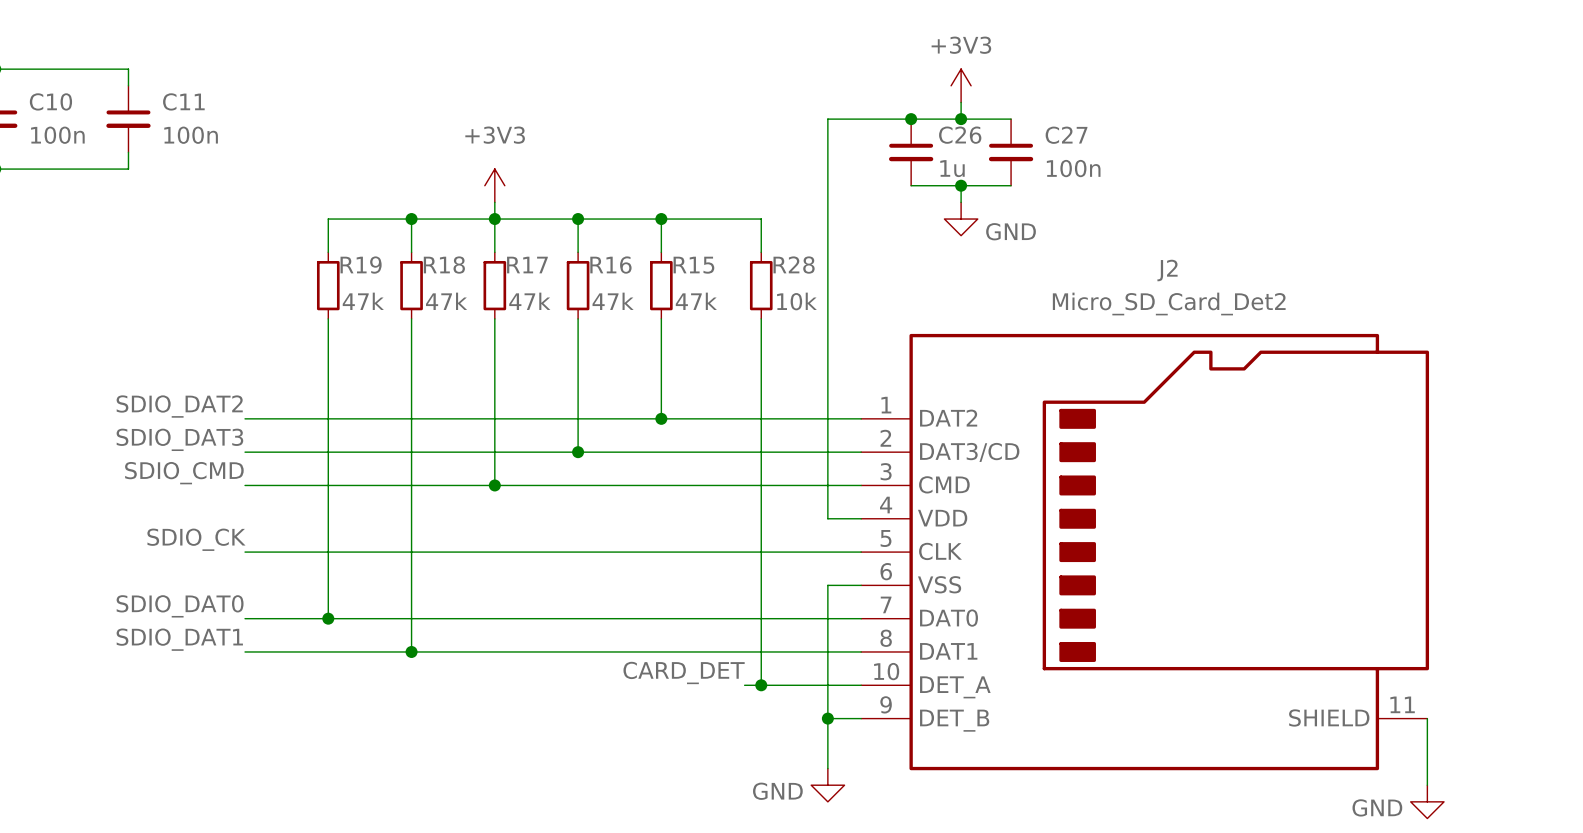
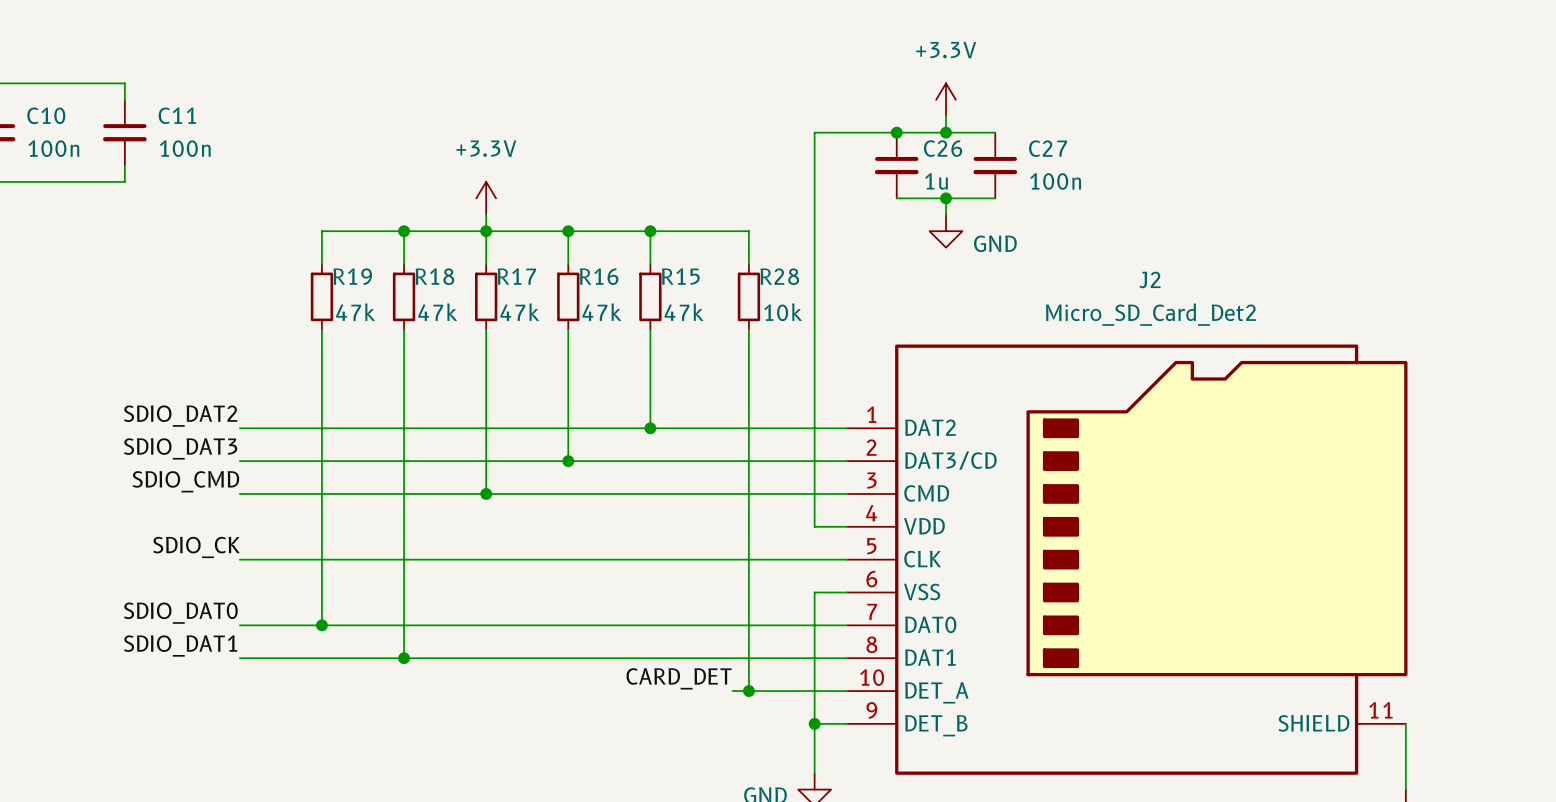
power symbol: +3V3 (961, 85) -> +3.3V (946, 99)
power symbol: +3V3 (494, 185) -> +3.3V (486, 198)

